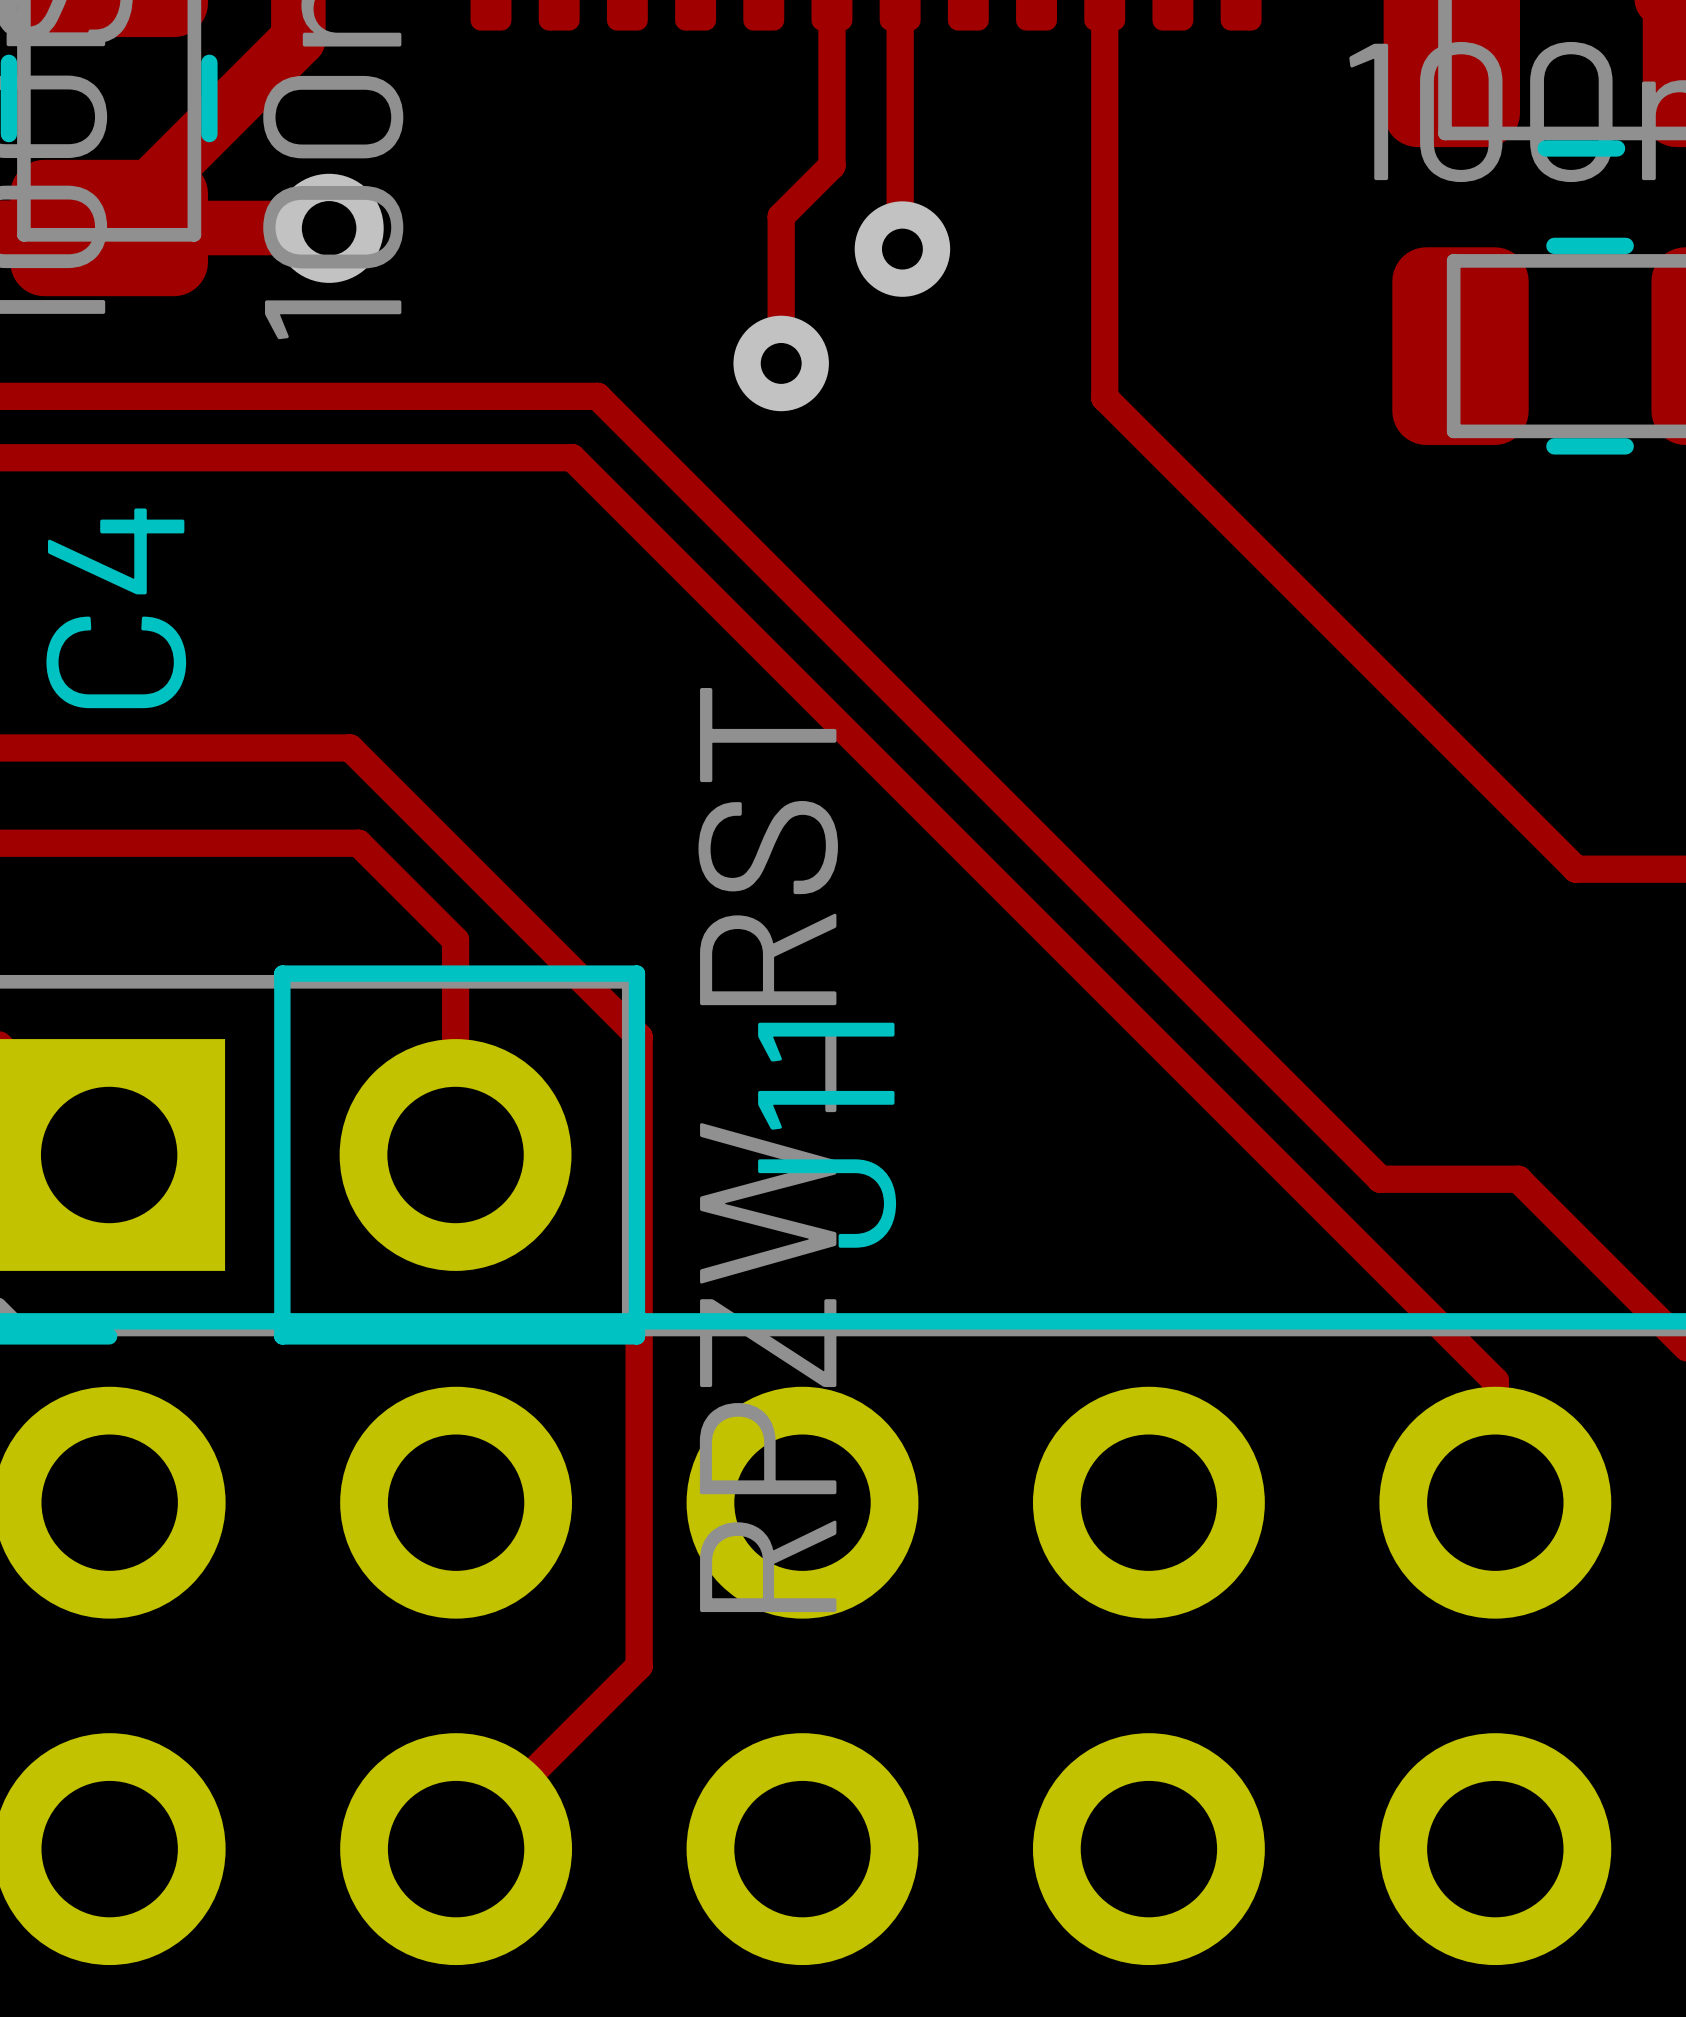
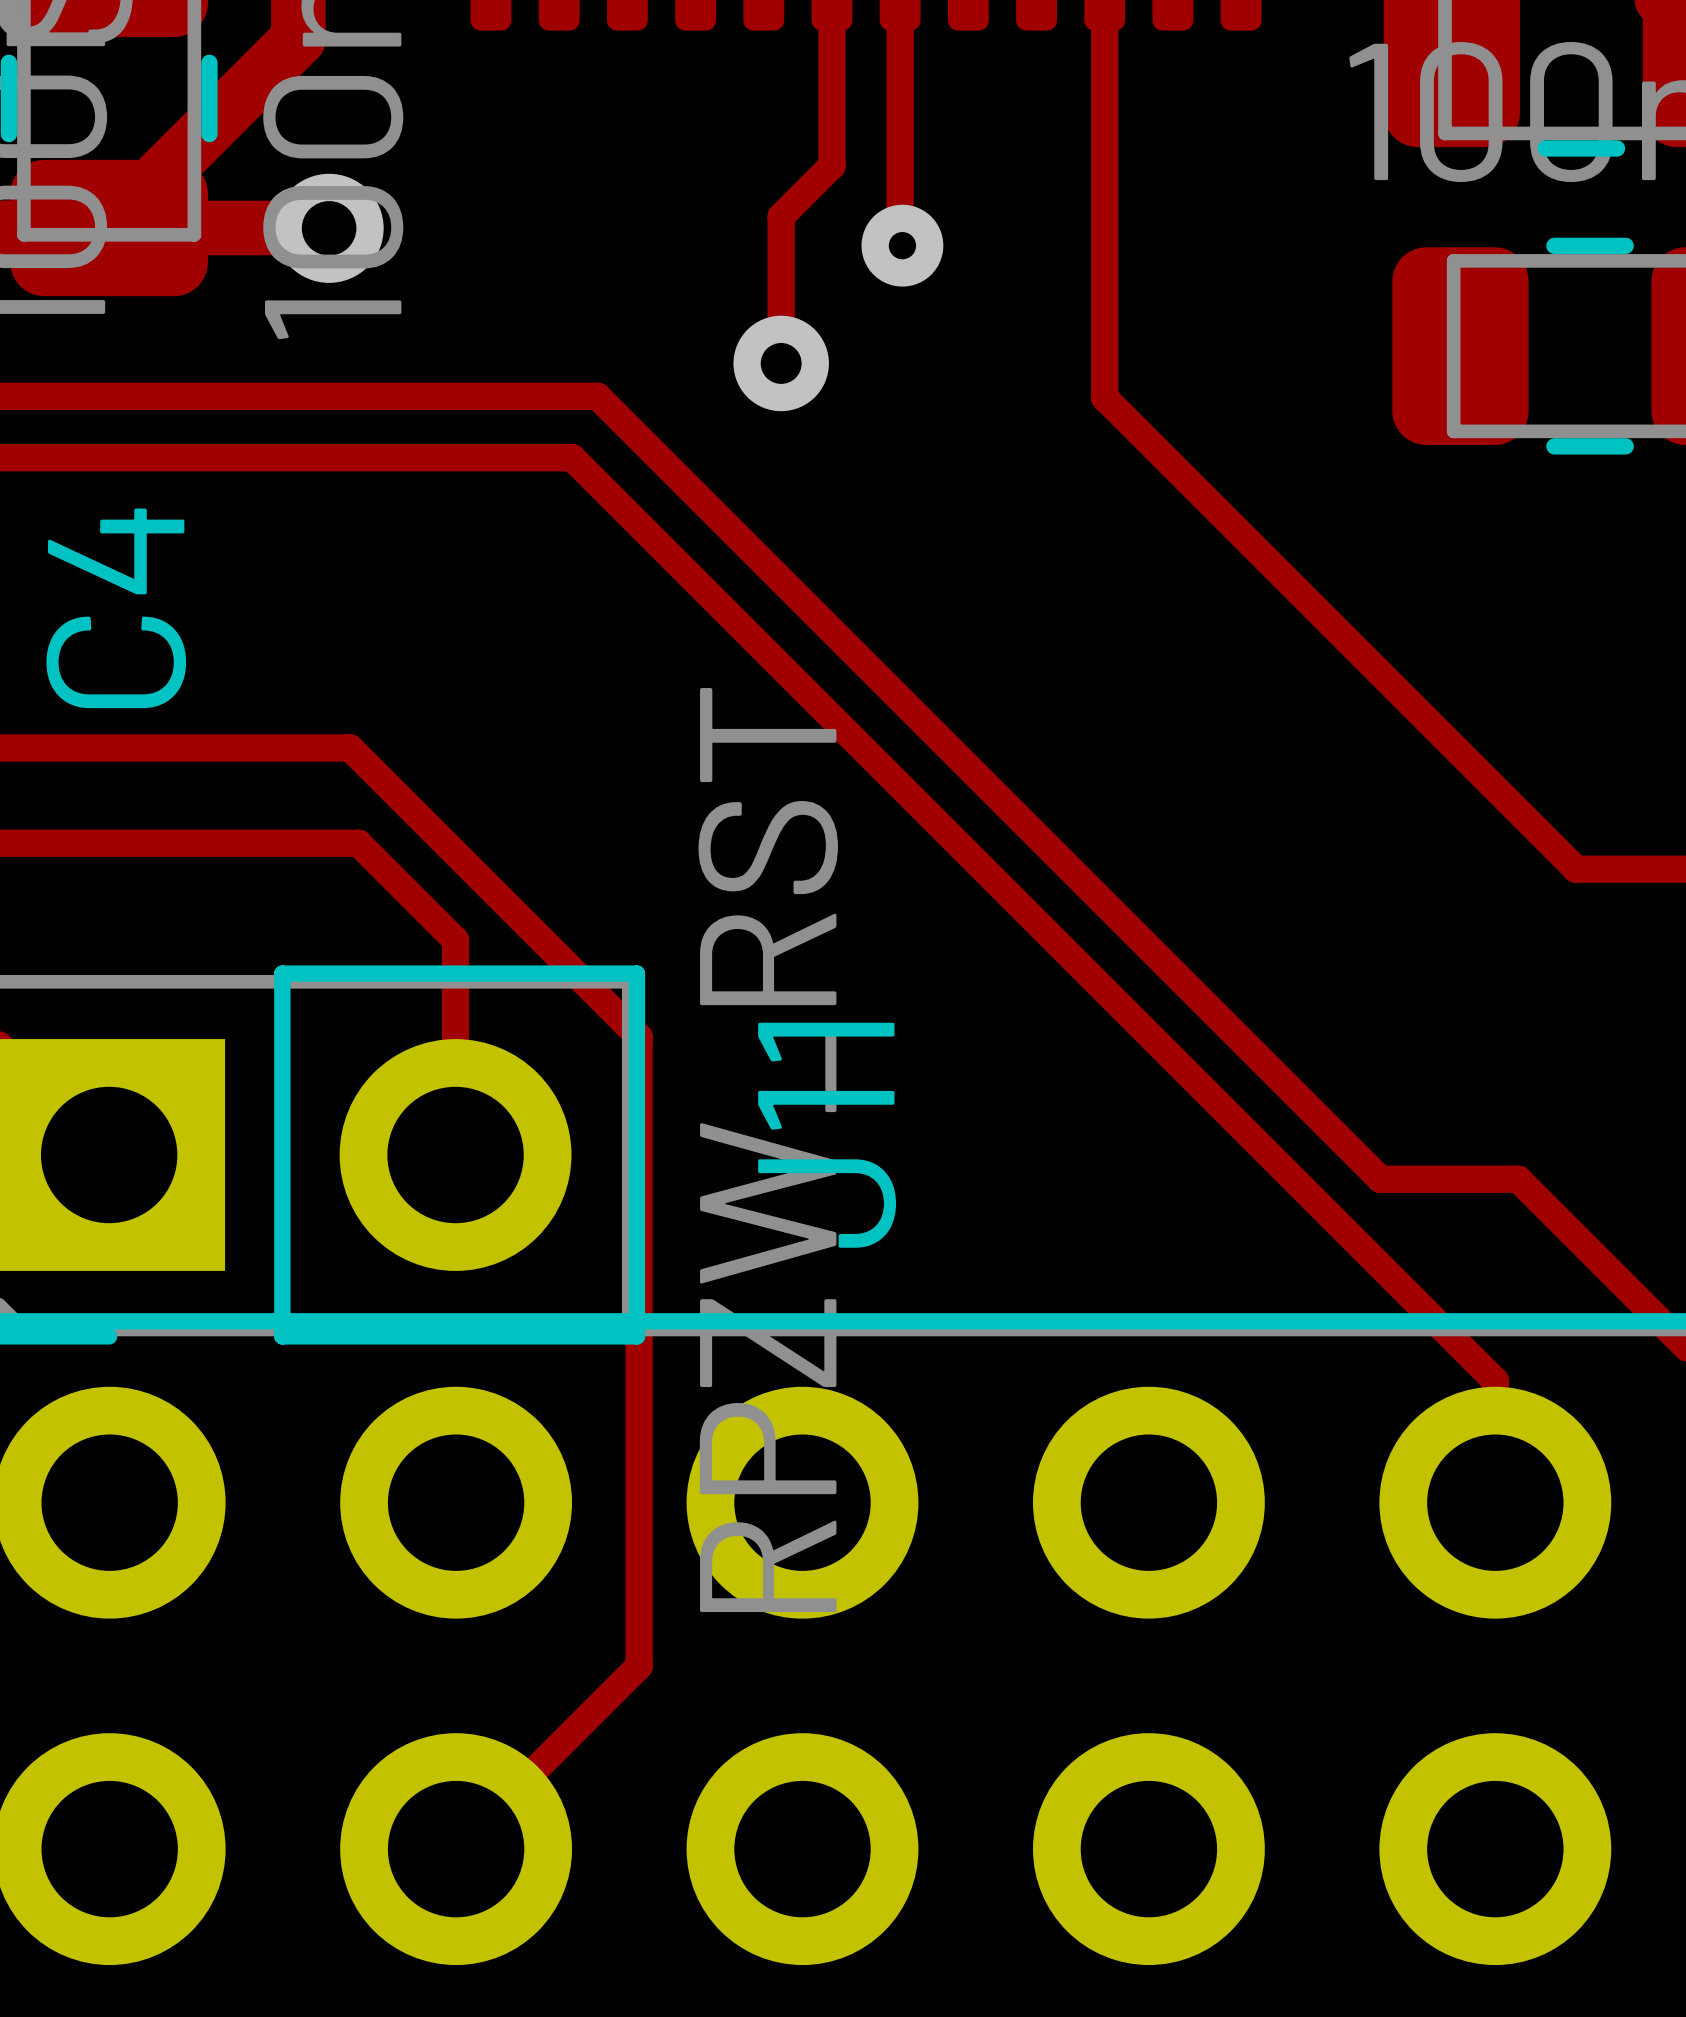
via size: [854, 201, 951, 297] -> [861, 204, 944, 287]

